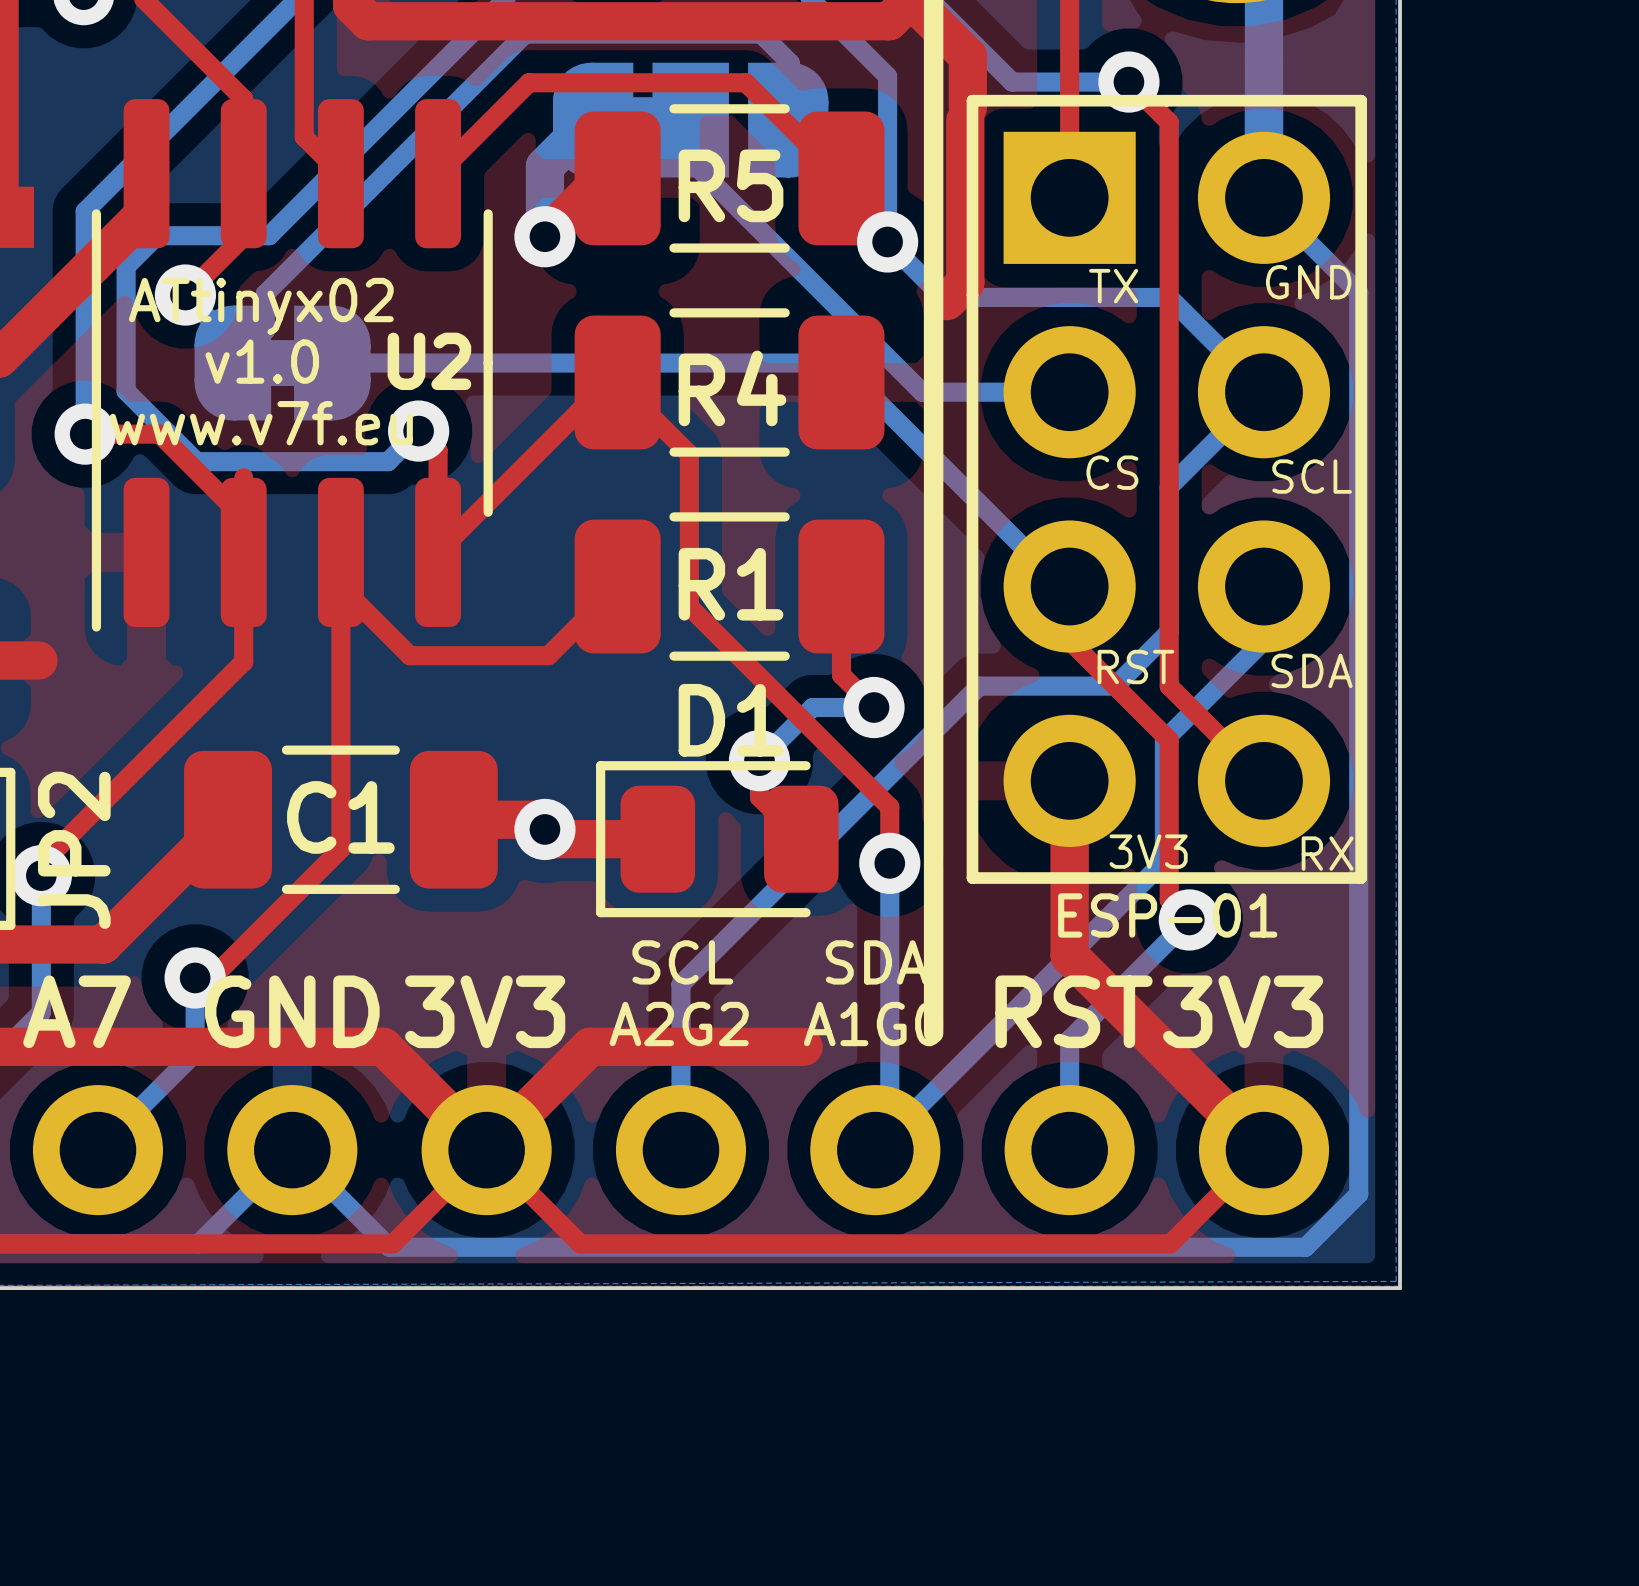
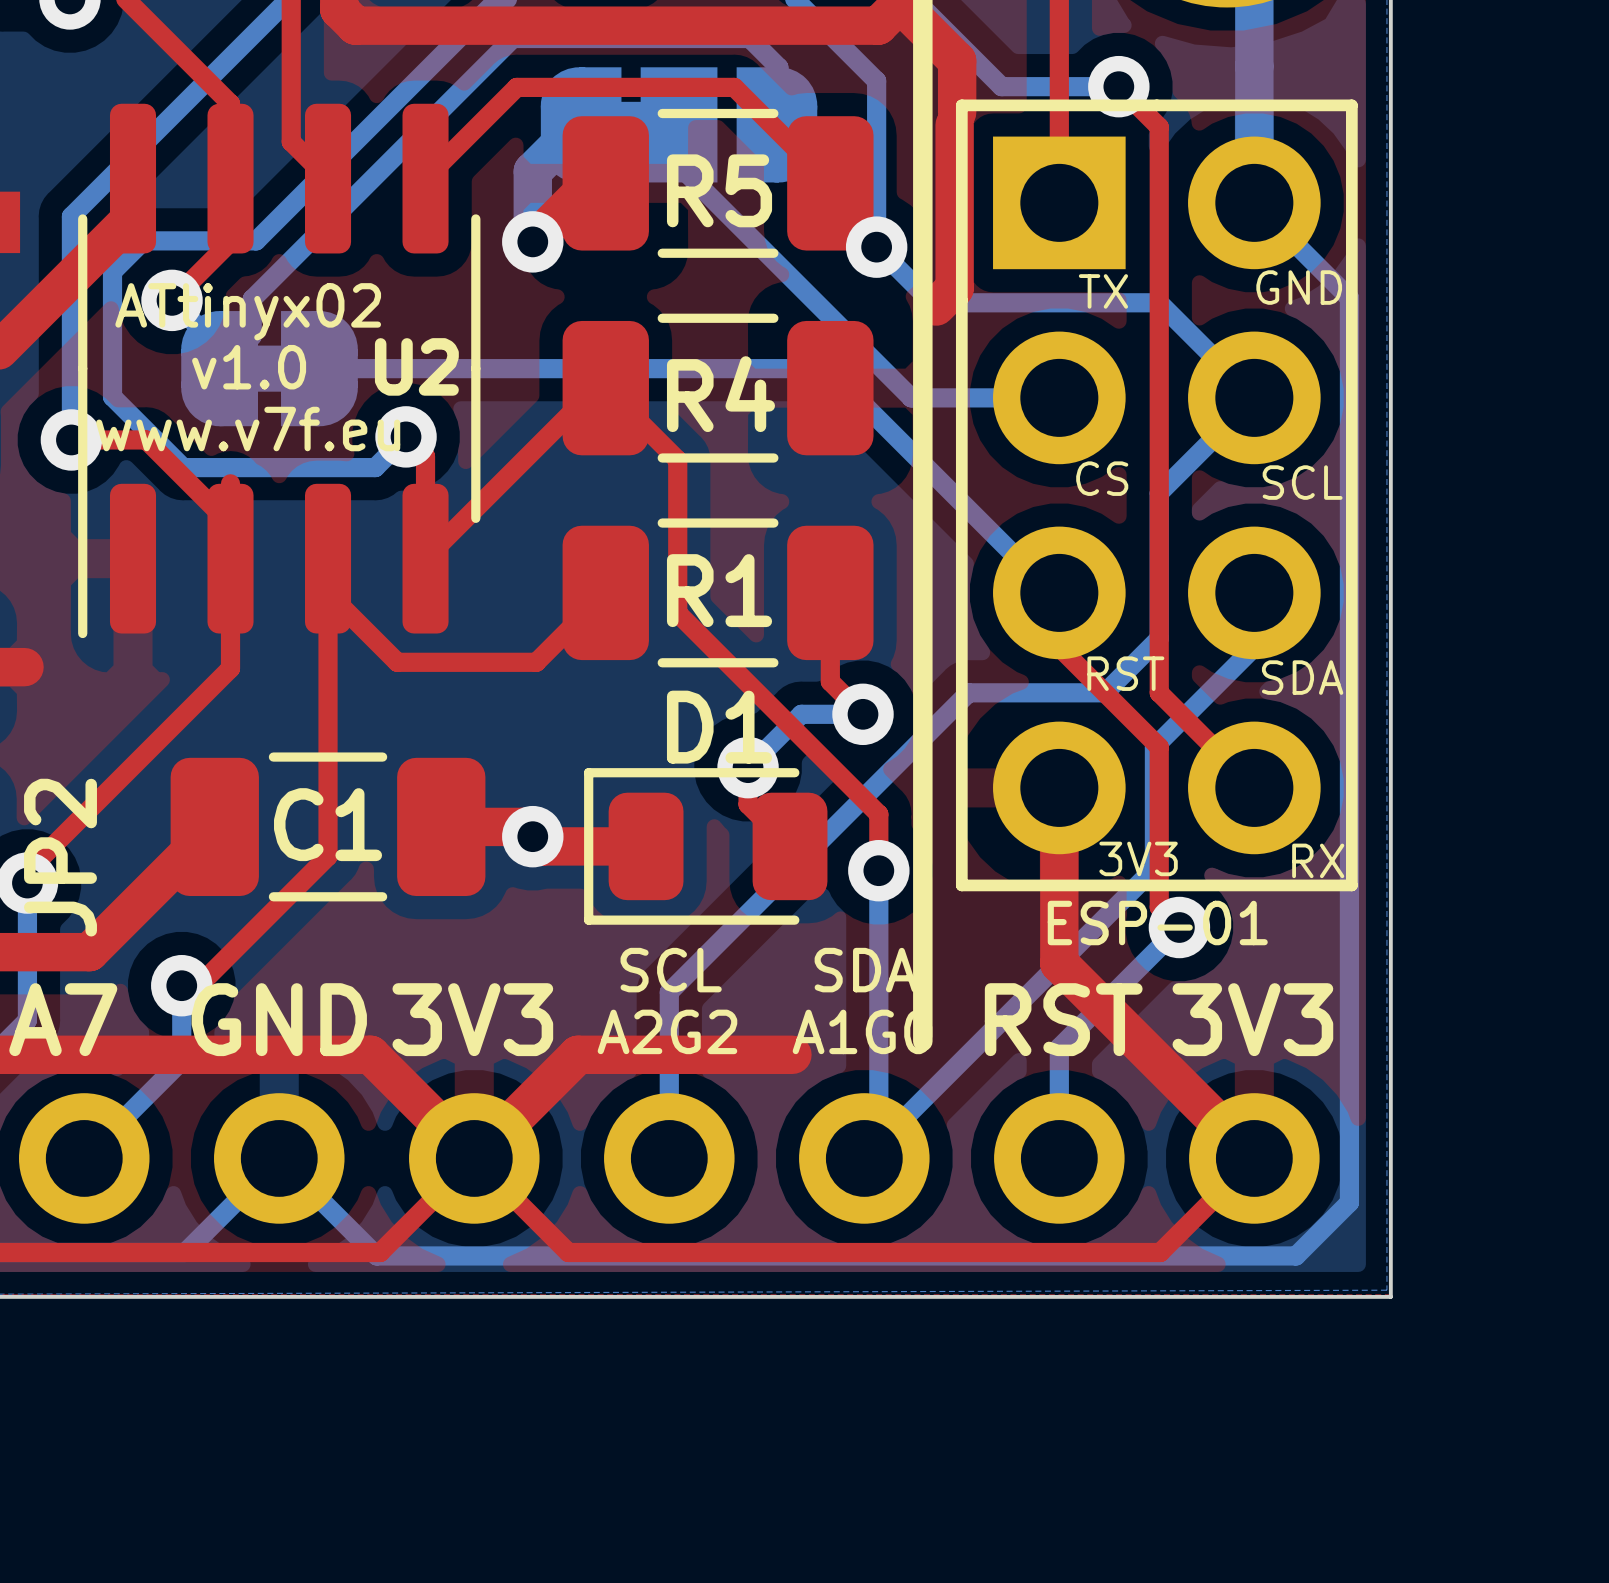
text position: 3V3 (1243, 1011) -> 3V3 (1252, 1019)

